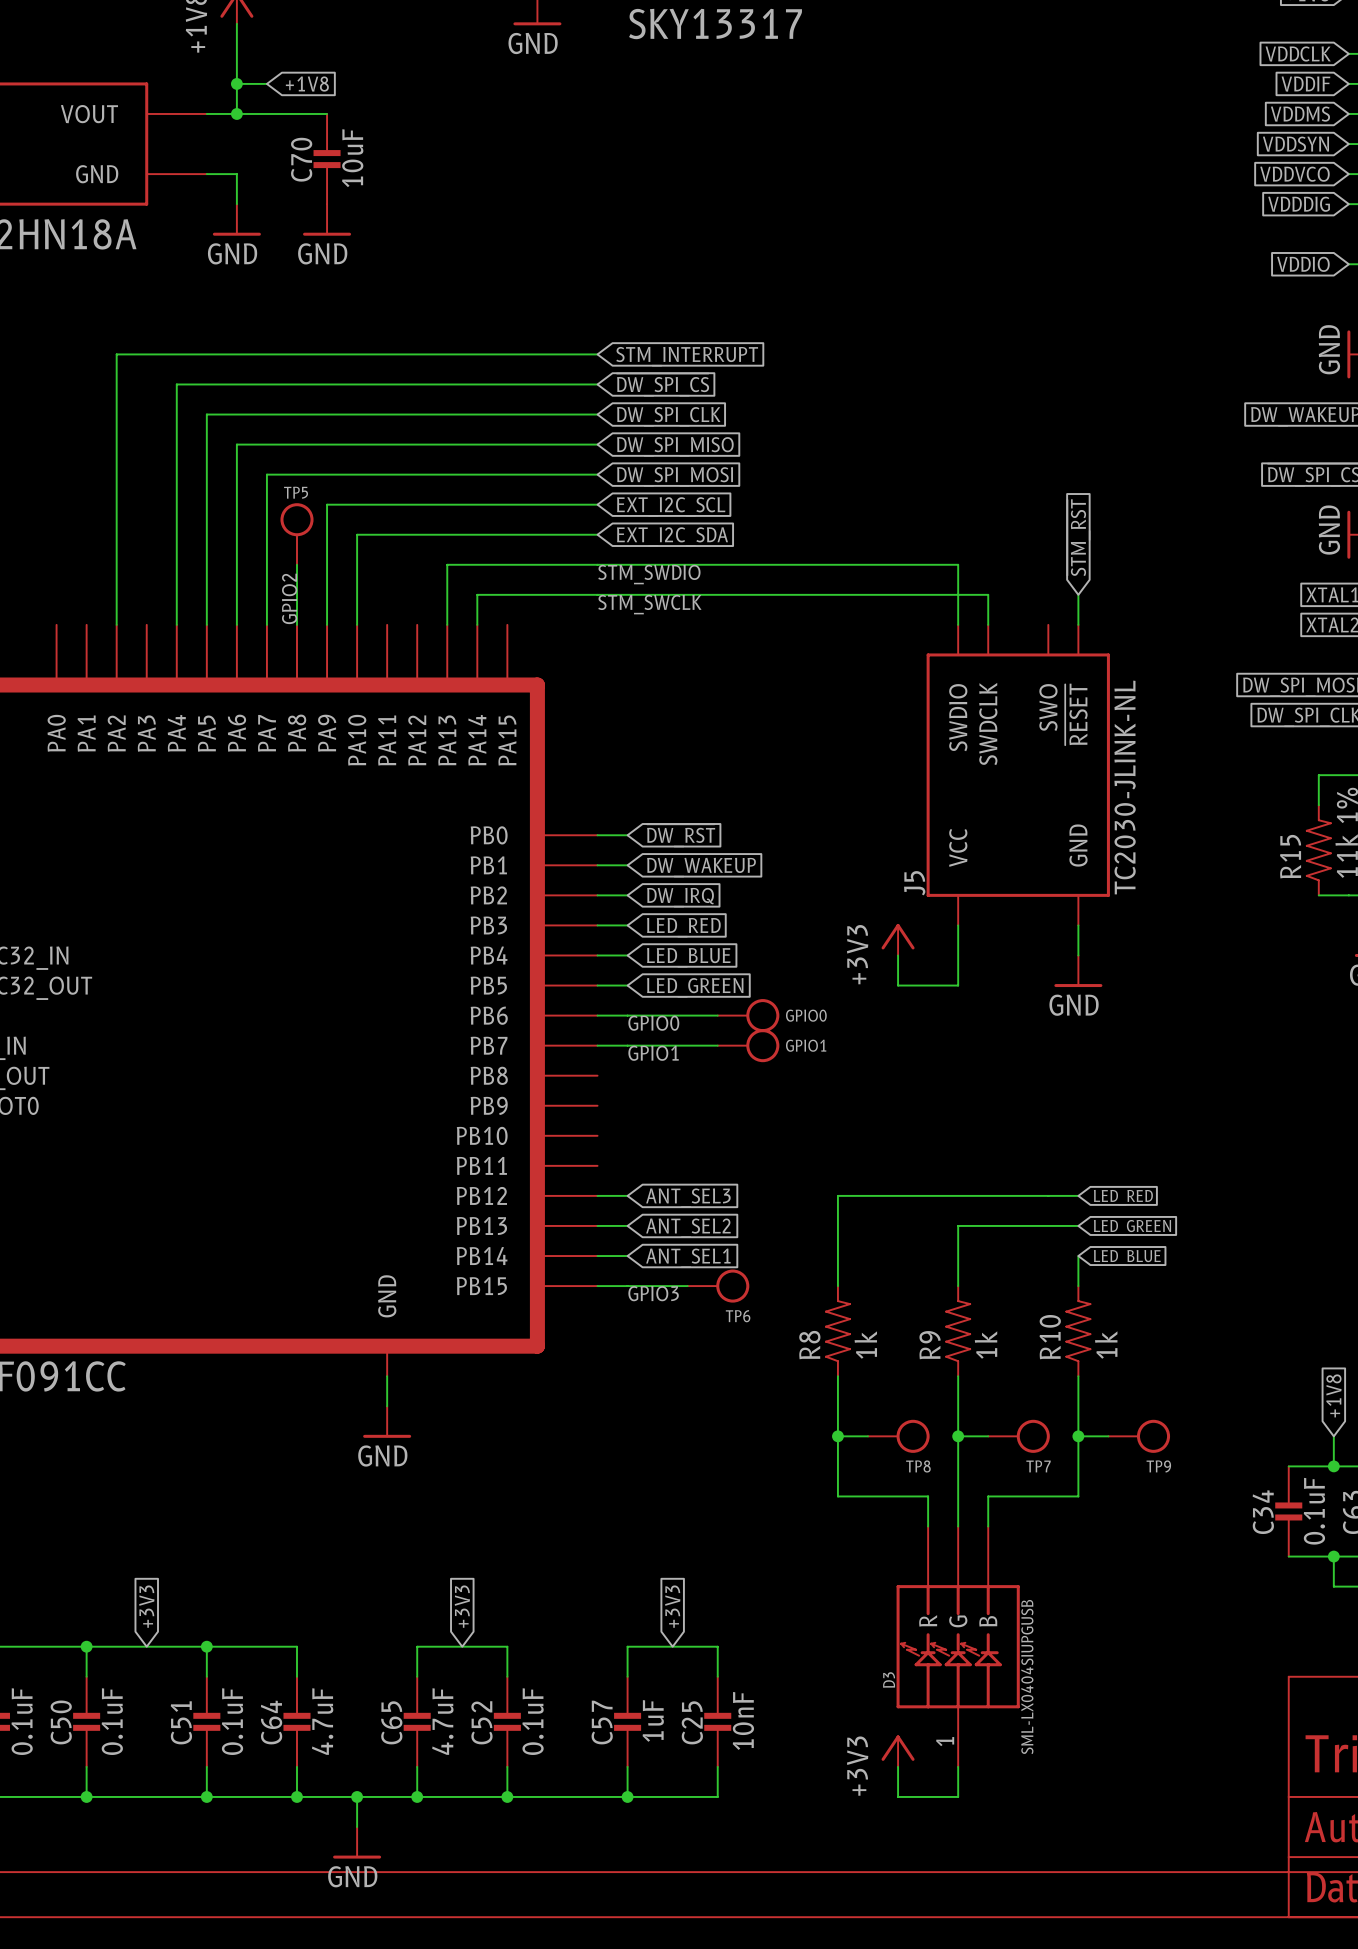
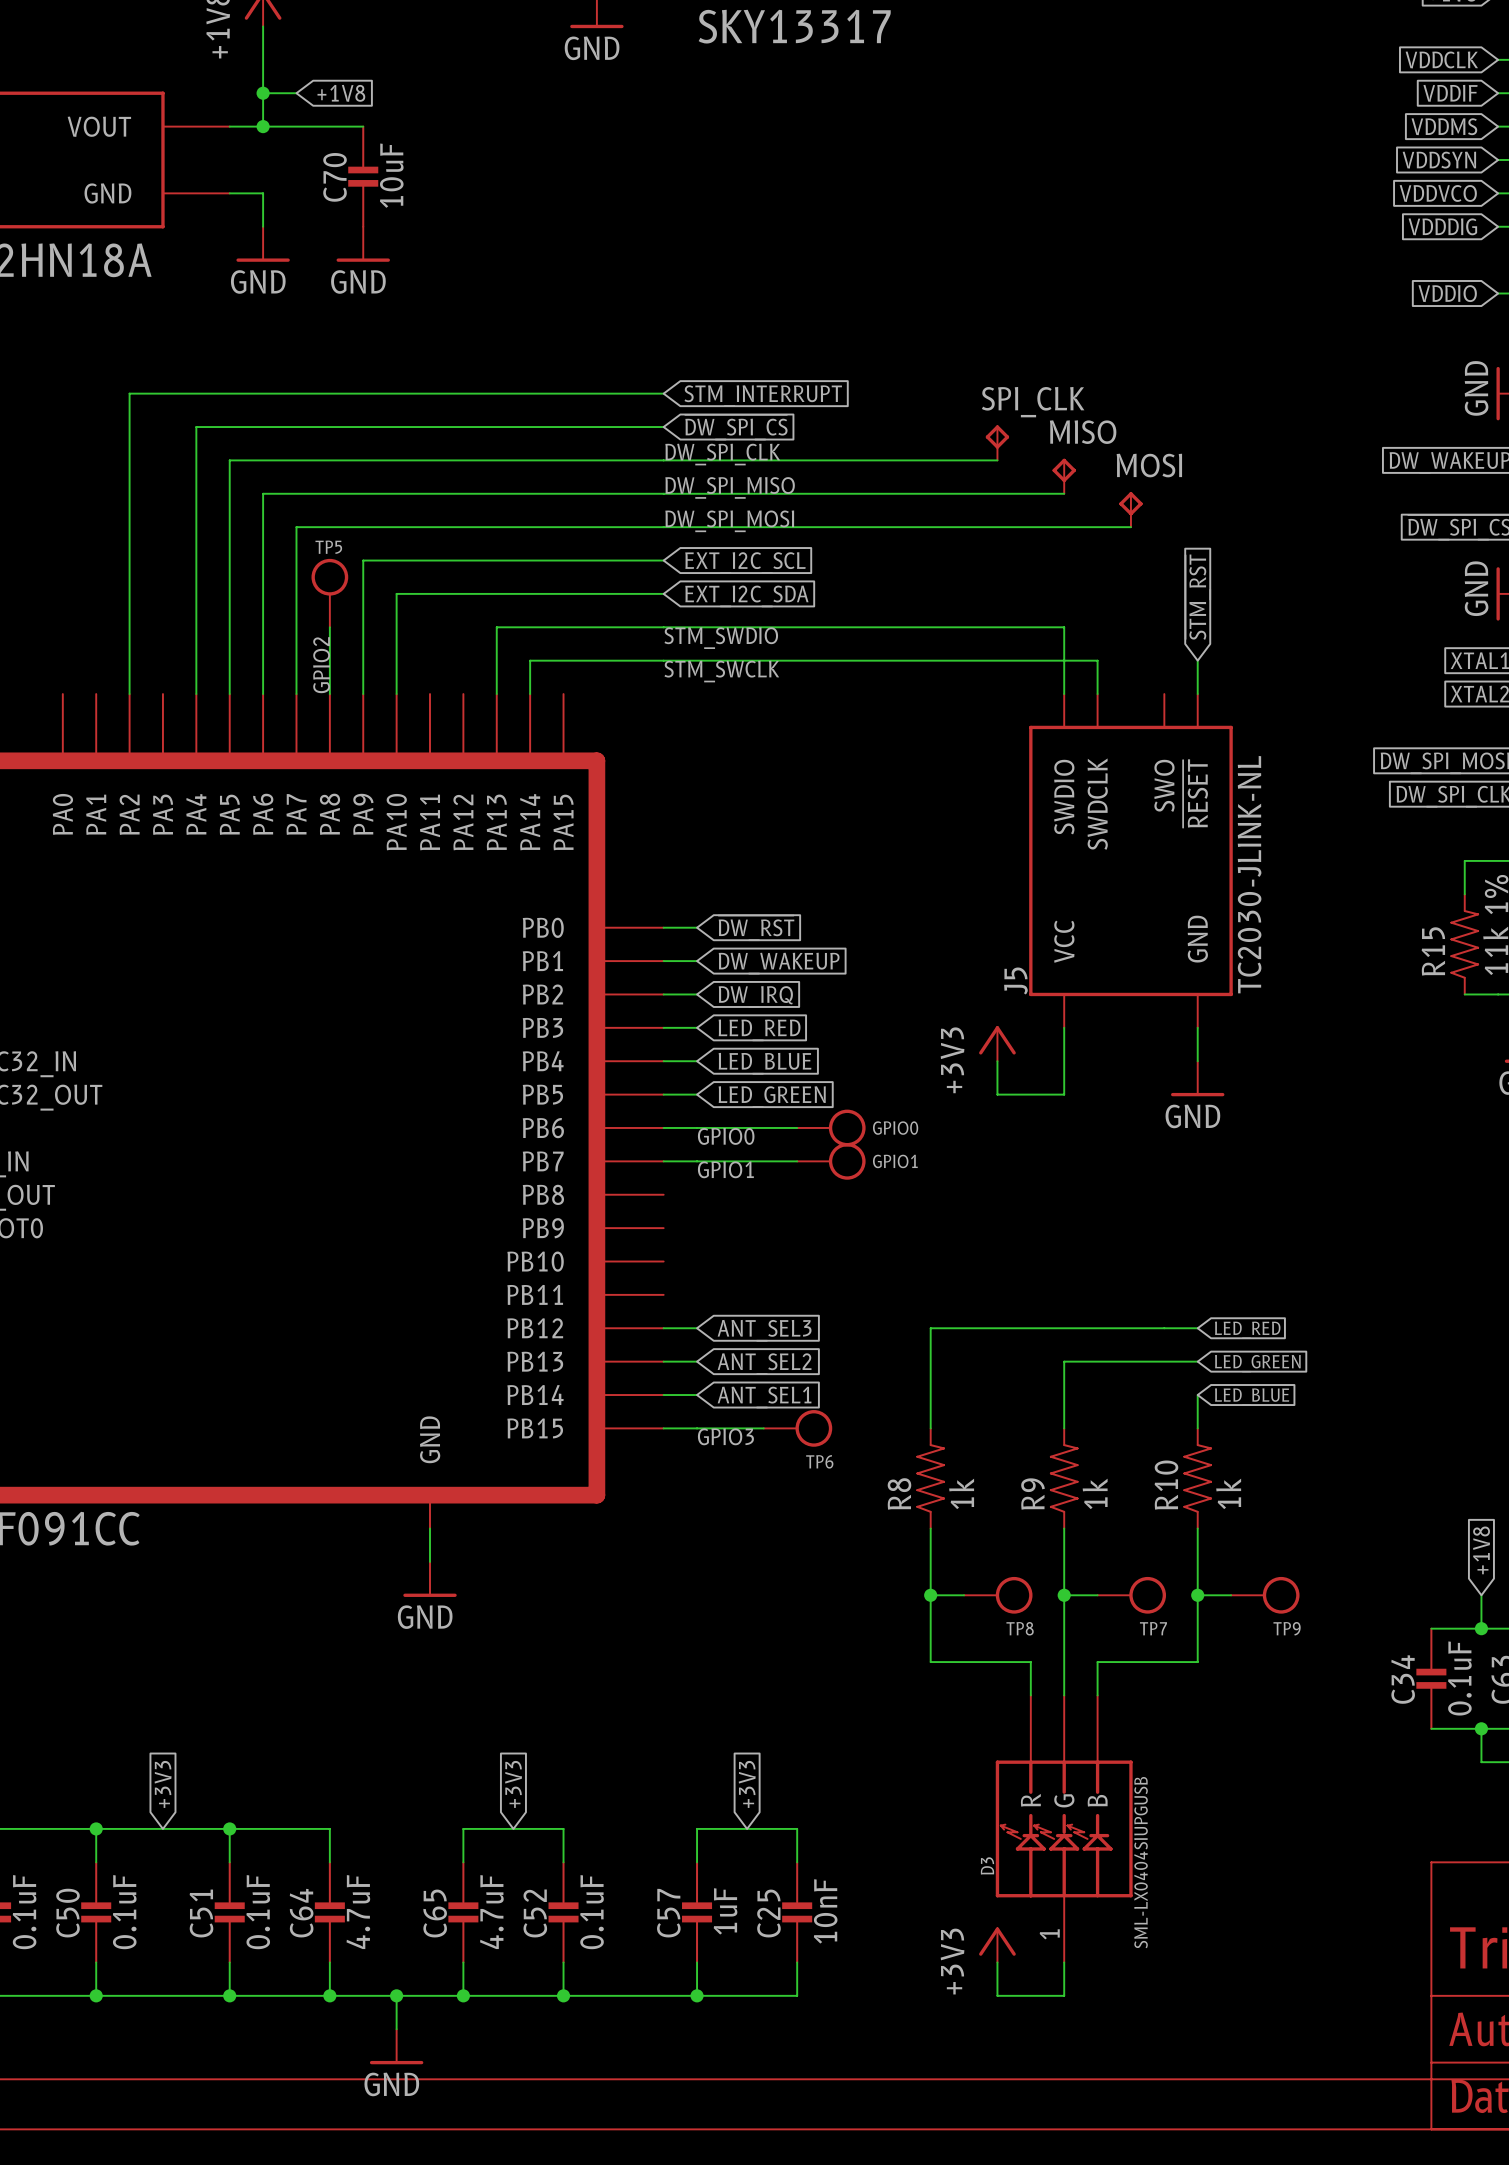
SPI_CLK: none -> (997, 442)
label: none -> DW_SPI_CLK (722, 454)
wire: none -> (663, 460) (997, 460)
global label: DW_SPI_CLK (668, 416) -> none
MISO: none -> (1064, 476)
label: none -> DW_SPI_MISO (730, 487)
wire: none -> (663, 493) (1064, 493)
global label: DW_SPI_MISO (675, 446) -> none
MOSI: none -> (1130, 509)
label: none -> DW_SPI_MOSI (729, 521)
wire: none -> (663, 527) (1130, 527)
global label: DW_SPI_MOSI (675, 476) -> none

